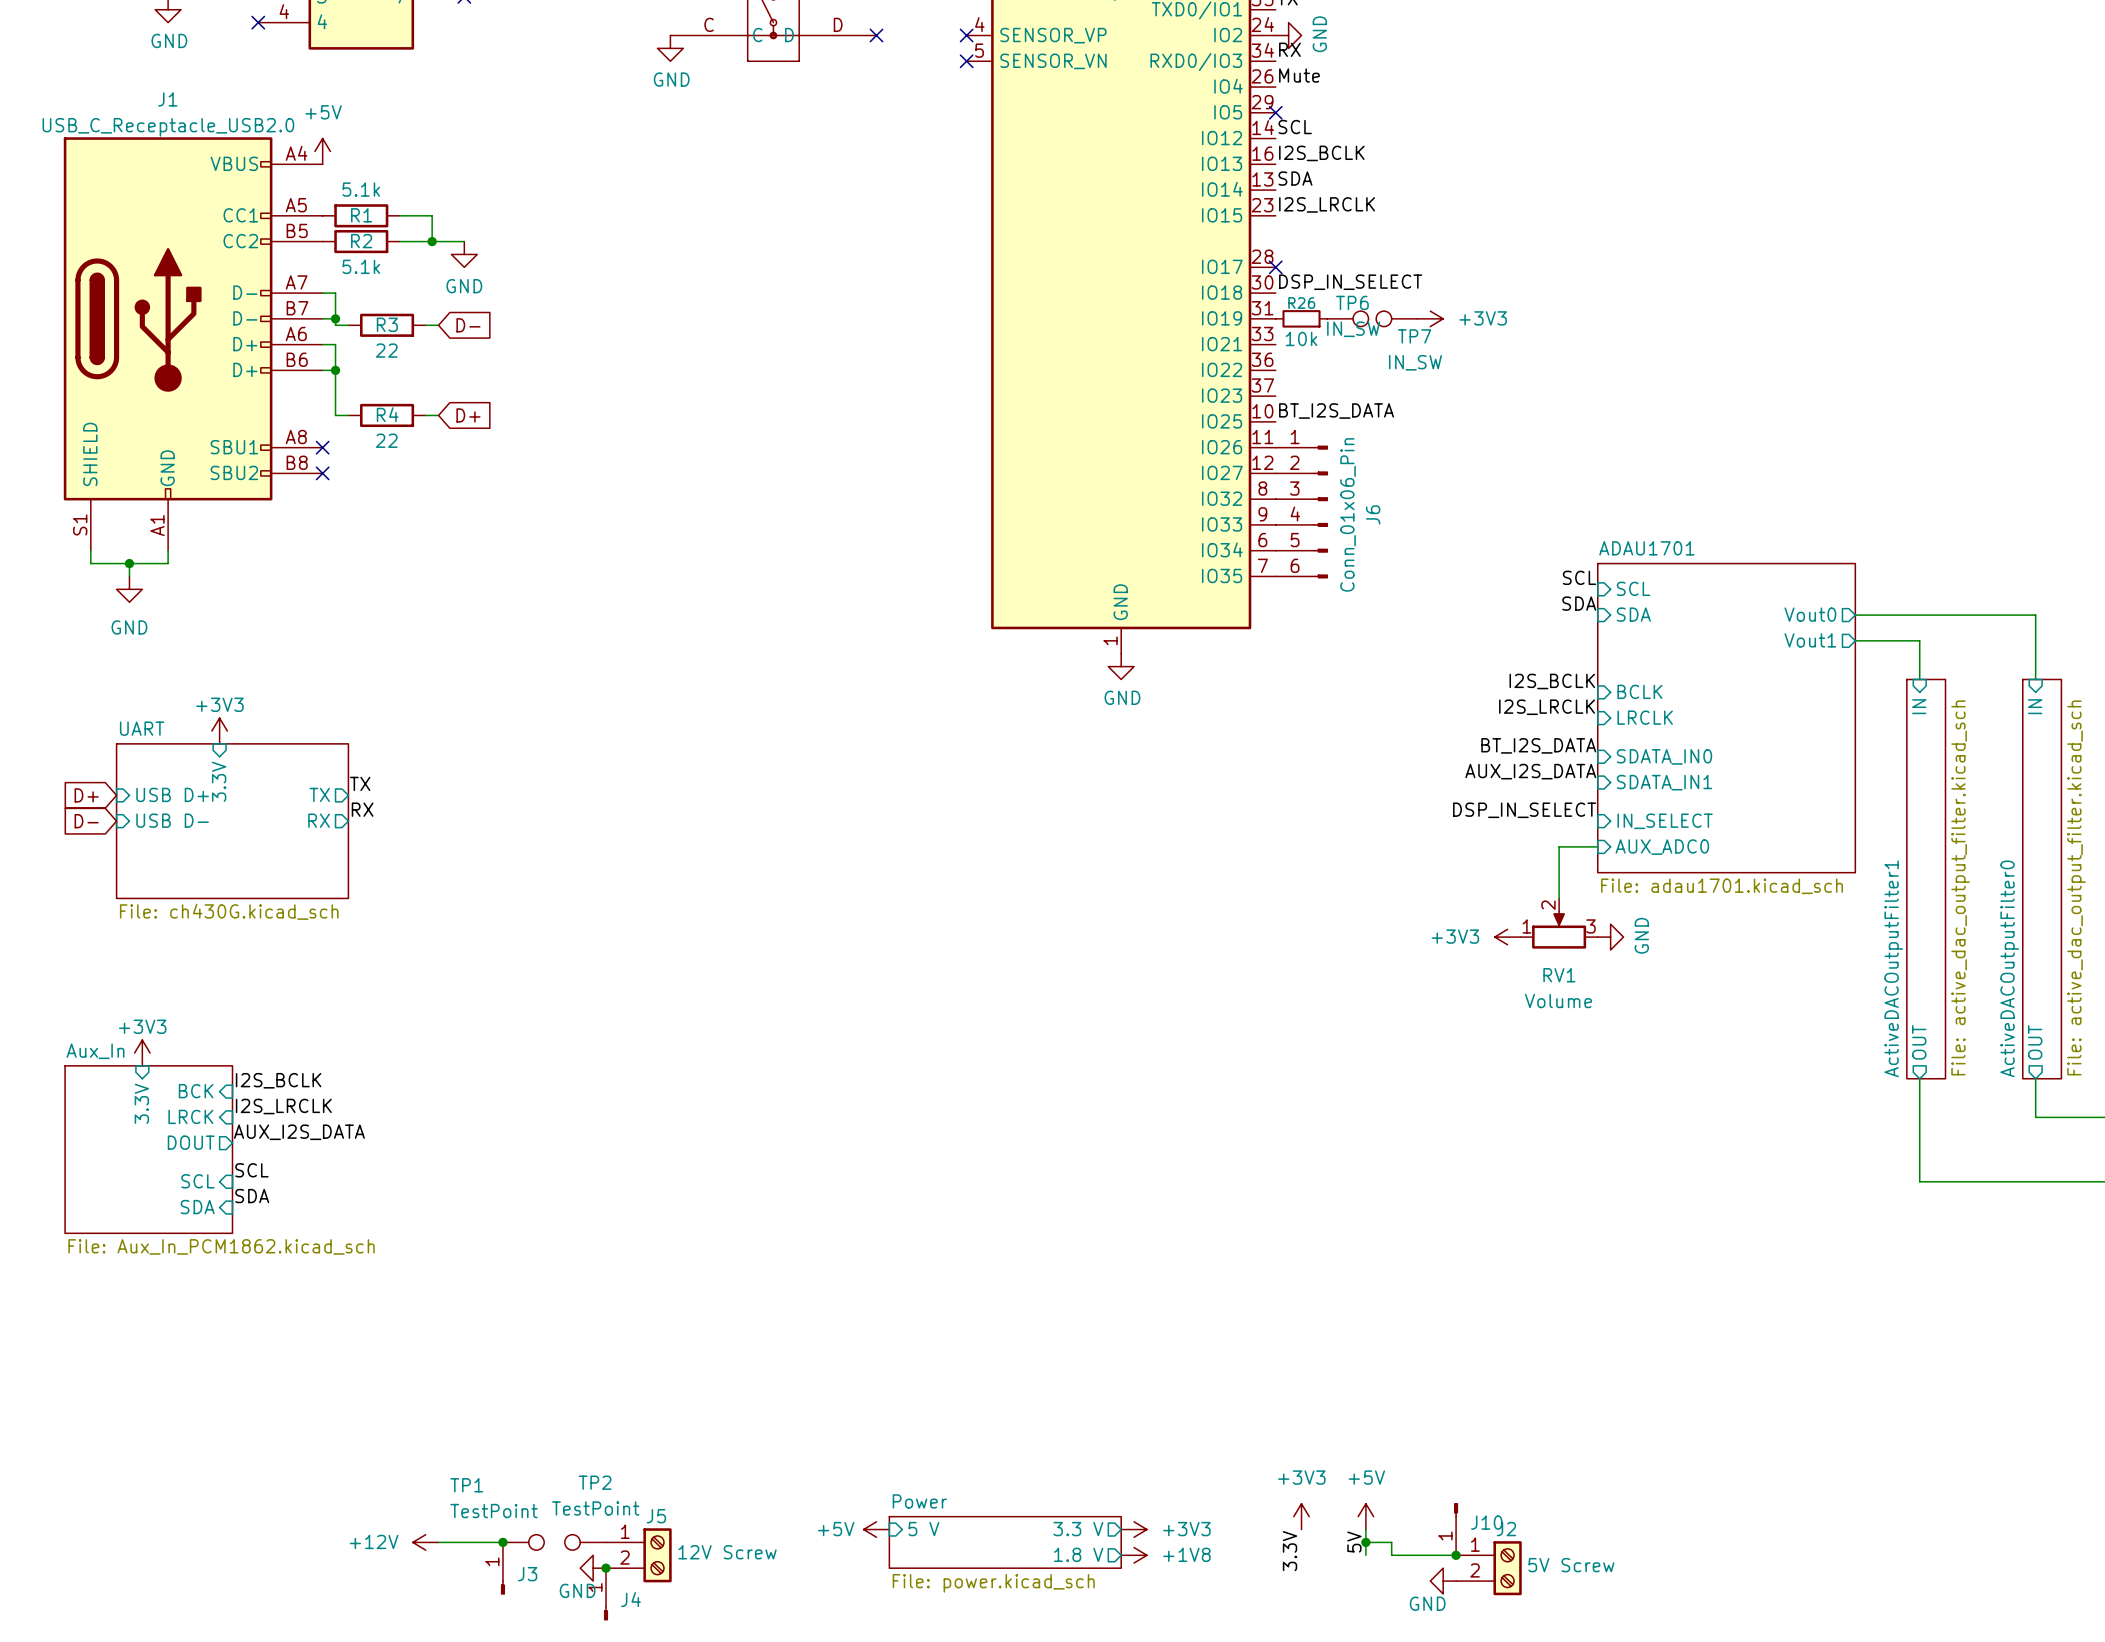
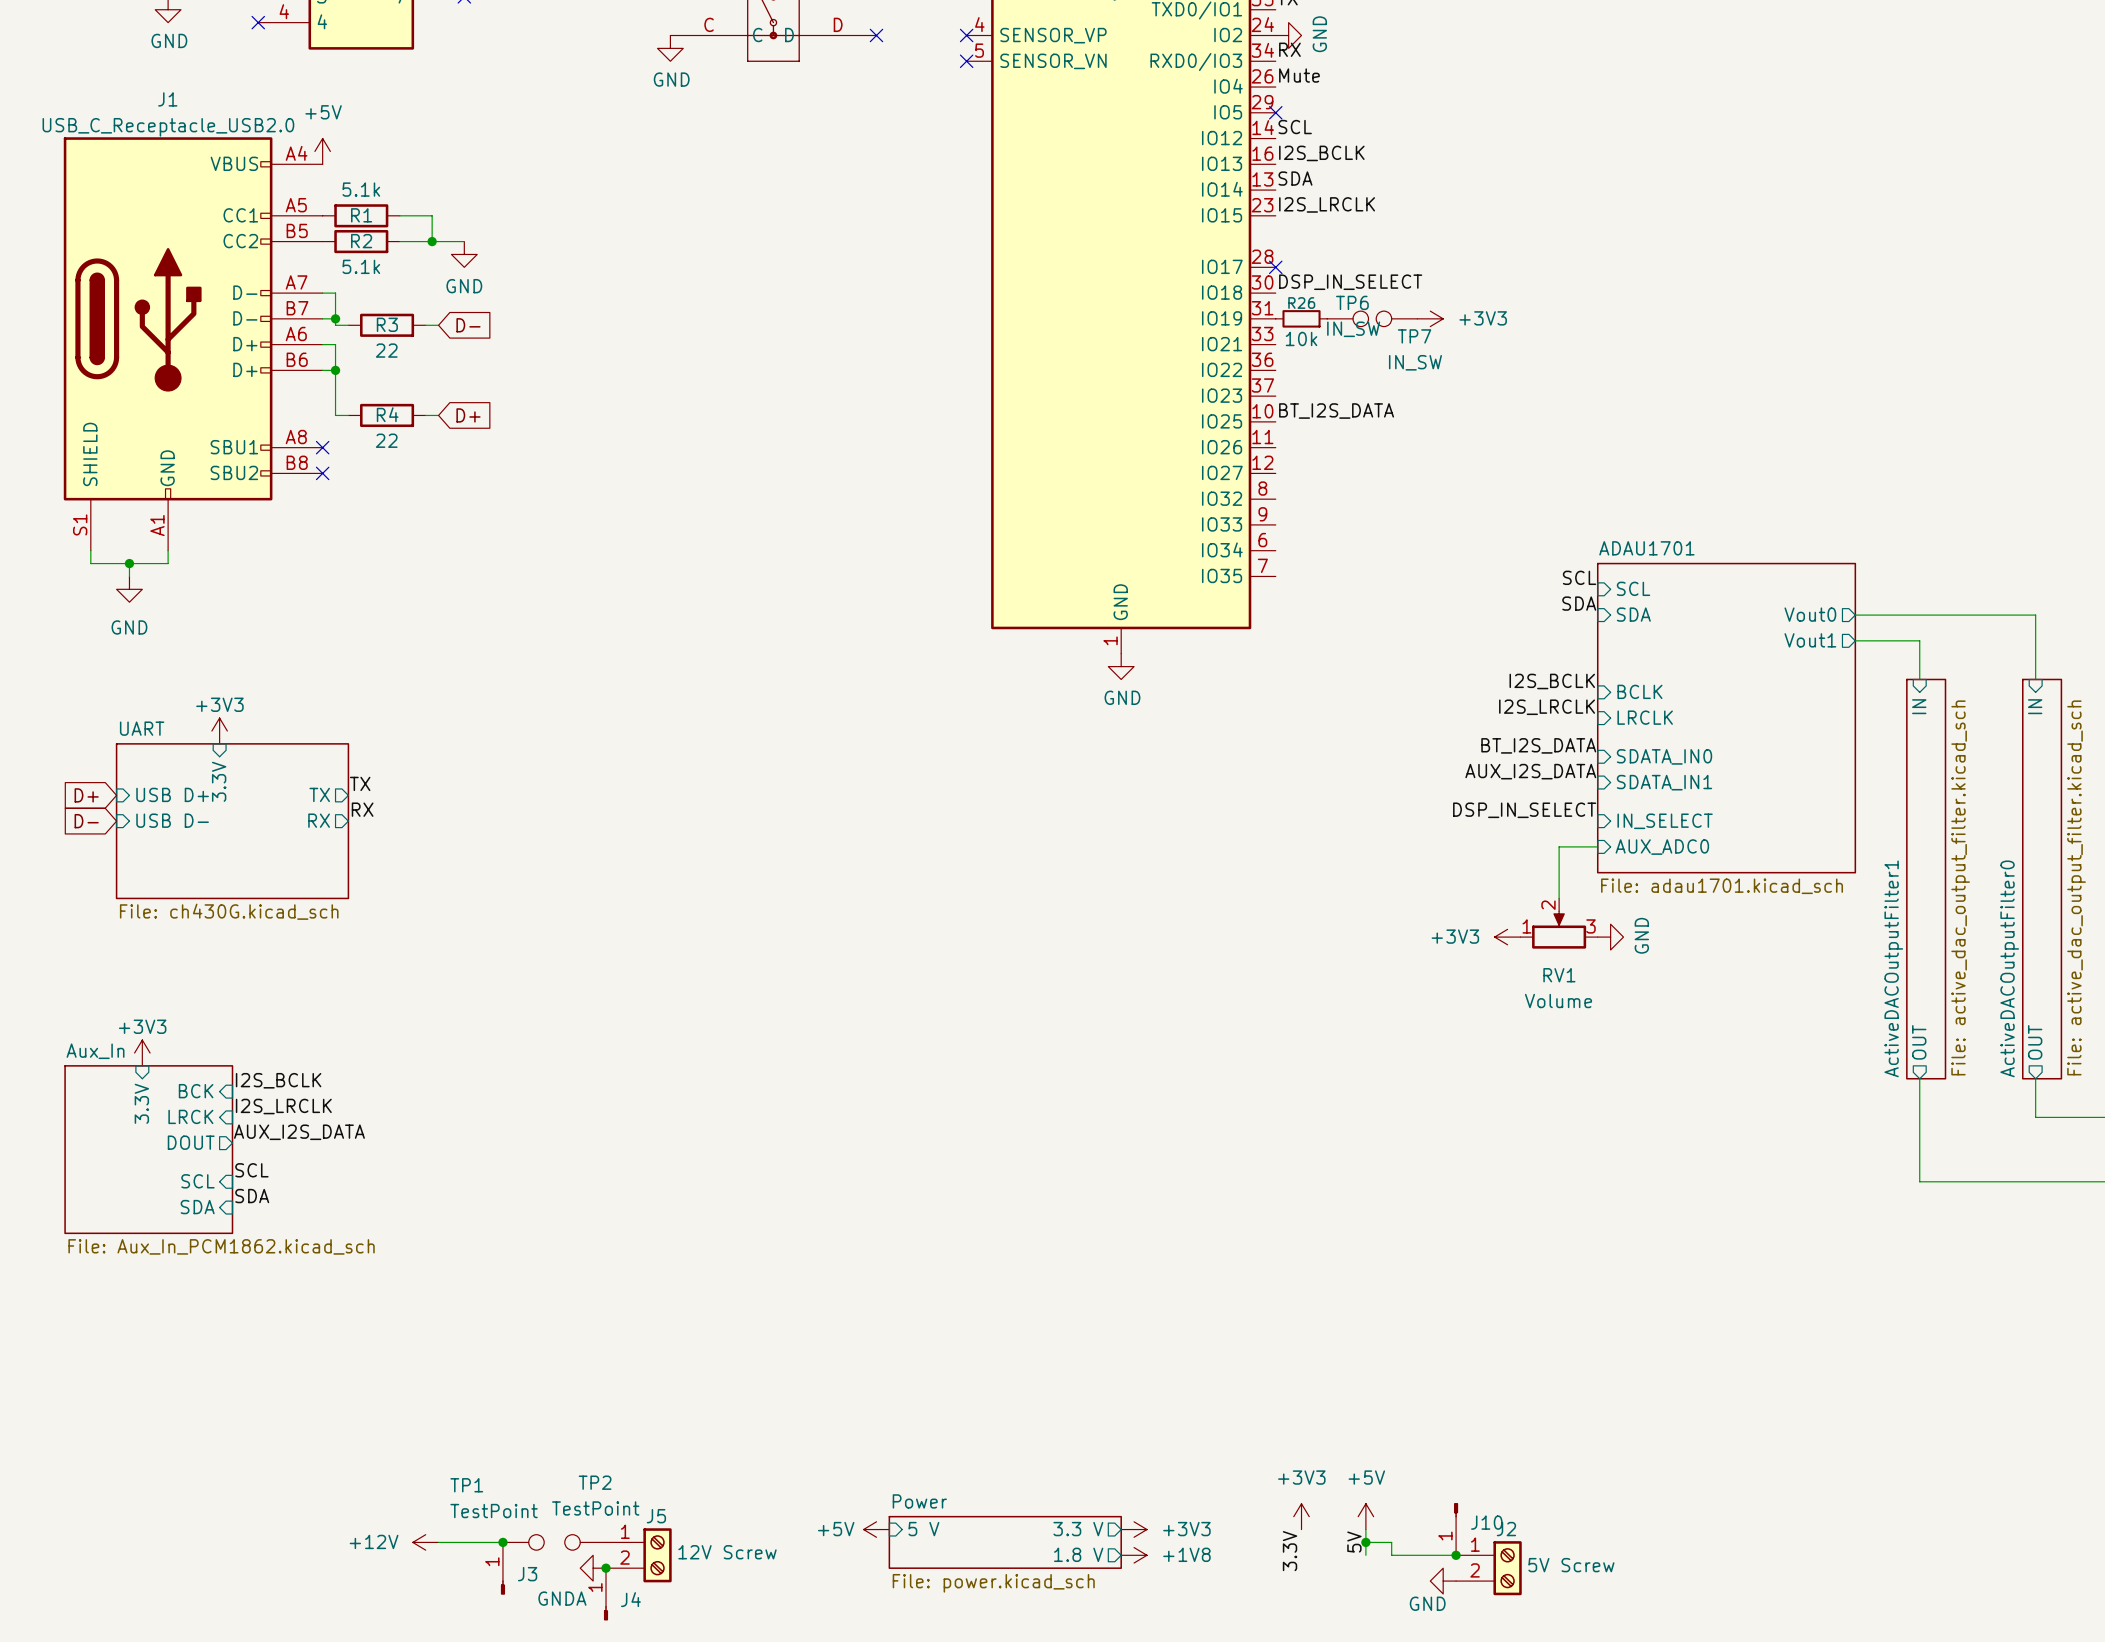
J6: Conn_01x06_Pin (1301, 512) -> none
power symbol: GND (593, 1568) -> GNDA (593, 1568)

